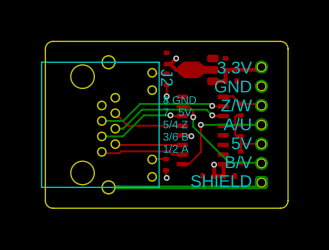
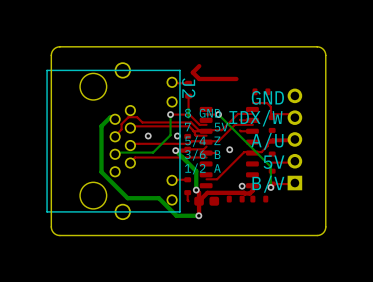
part: (166, 58) -> none
via: (176, 58) -> none
part footprint: [254, 60, 269, 190] -> [287, 88, 303, 191]
part: (225, 64) -> none
text: 3.3V (234, 67) -> none
top track: (261, 67) (258, 69) (225, 69) (225, 81) (212, 81) -> none
part: (198, 69) -> none
top track: none -> (252, 103) (267, 103) (270, 106) (270, 114) (291, 114) (294, 117)
via: (166, 96) -> none
top track: (223, 96) (233, 96) (240, 103) (261, 105) -> none
top track: none -> (206, 113) (218, 114)
top track: none -> (252, 113) (238, 113) (221, 130) (198, 130) (191, 122) (142, 122) (137, 117) (128, 117) (121, 124) (121, 129) (115, 135)
top track: none -> (170, 114) (189, 114) (199, 124) (206, 124)
bottom track: none -> (170, 114) (170, 135) (153, 152) (115, 152)
via: none -> (170, 114)
bottom track: none -> (218, 114) (270, 166) (270, 187)
via: none -> (218, 114)
bottom track: none -> (115, 117) (110, 117) (101, 126) (101, 172) (127, 198) (158, 198) (176, 215) (198, 215)
text: none -> IDX/W (255, 118)
bottom track: (212, 105) (210, 103) (140, 103) (123, 120) (101, 120) -> none
via: (212, 105) -> none
text: Z/W (236, 105) -> none
top track: (182, 106) (188, 106) (193, 110) (193, 117) -> none
top track: none -> (252, 124) (234, 124) (218, 141) (192, 141) (189, 143) (131, 143)
top track: none -> (131, 126) (189, 126) (195, 135) (206, 135)
top track: (115, 113) (127, 125) (182, 125) -> none
bottom track: (170, 115) (143, 115) (122, 136) (101, 136) -> none
via: (170, 115) -> none
bottom track: (212, 115) (206, 109) (142, 109) (123, 128) (115, 128) -> none
via: (212, 115) -> none
top track: (240, 115) (235, 117) (235, 134) (240, 136) (240, 151) -> none
bottom track: (193, 117) (193, 126) (229, 162) (261, 163) -> none
via: (193, 117) -> none
via: none -> (148, 136)
via: none -> (177, 136)
top track: none -> (294, 139) (272, 139) (261, 152) (244, 152) (217, 179) (206, 179)
top track: (200, 124) (200, 152) (188, 164) (182, 164) -> none
via: (200, 124) -> none
bottom track: (261, 124) (200, 124) -> none
part: none -> (187, 142)
top track: none -> (206, 146) (203, 149) (175, 150)
via: none -> (229, 149)
bottom track: none -> (175, 150) (196, 171) (196, 190)
via: none -> (175, 150)
via: (191, 136) -> none
top track: none -> (206, 157) (135, 157) (131, 161)
top track: (115, 144) (182, 144) -> none
top track: (101, 151) (119, 153) (121, 151) (169, 151) (172, 154) (182, 154) -> none
top track: (214, 164) (214, 175) (223, 175) (223, 168) -> (199, 201) (207, 192) (249, 193) (252, 190)
via: none -> (270, 187)
top track: none -> (196, 190) (199, 192) (198, 215)
via: none -> (196, 190)
via: (166, 177) -> none
part: none -> (206, 201)
text: SHIELD (221, 181) -> none
bottom track: (261, 182) (257, 187) (108, 187) -> none
via: none -> (198, 215)

